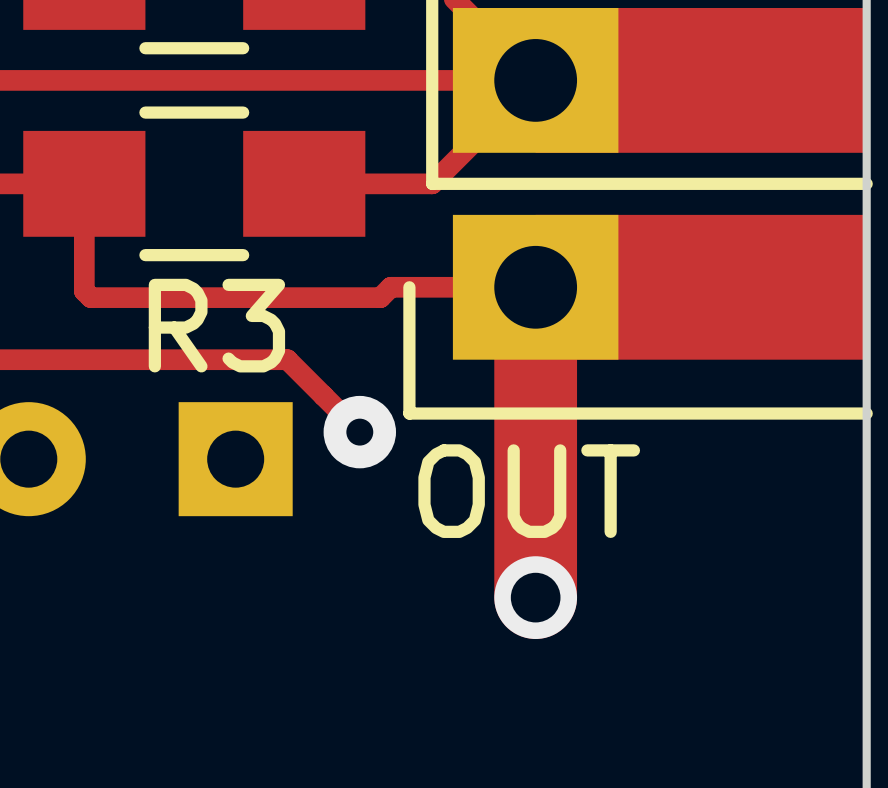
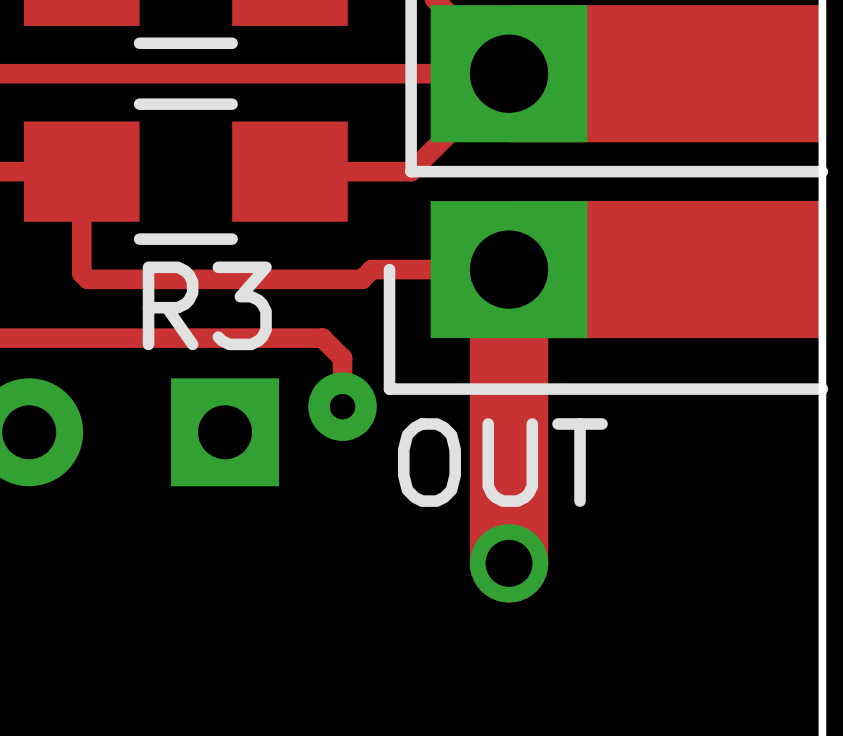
track: (287, 359) (359, 432) -> (274, 338) (322, 338) (342, 358) (342, 406)

